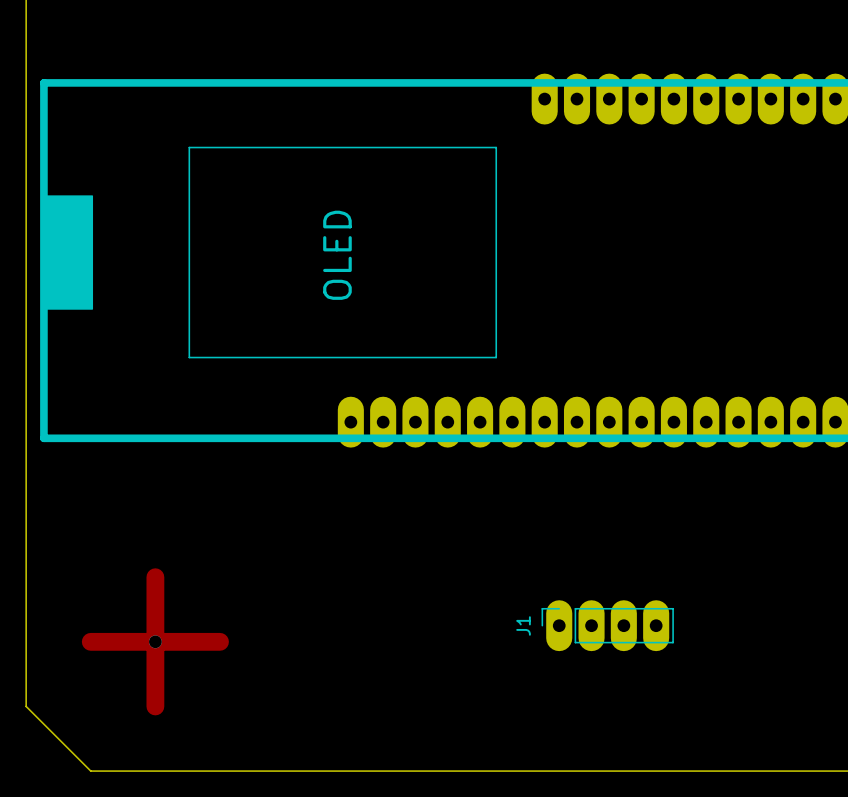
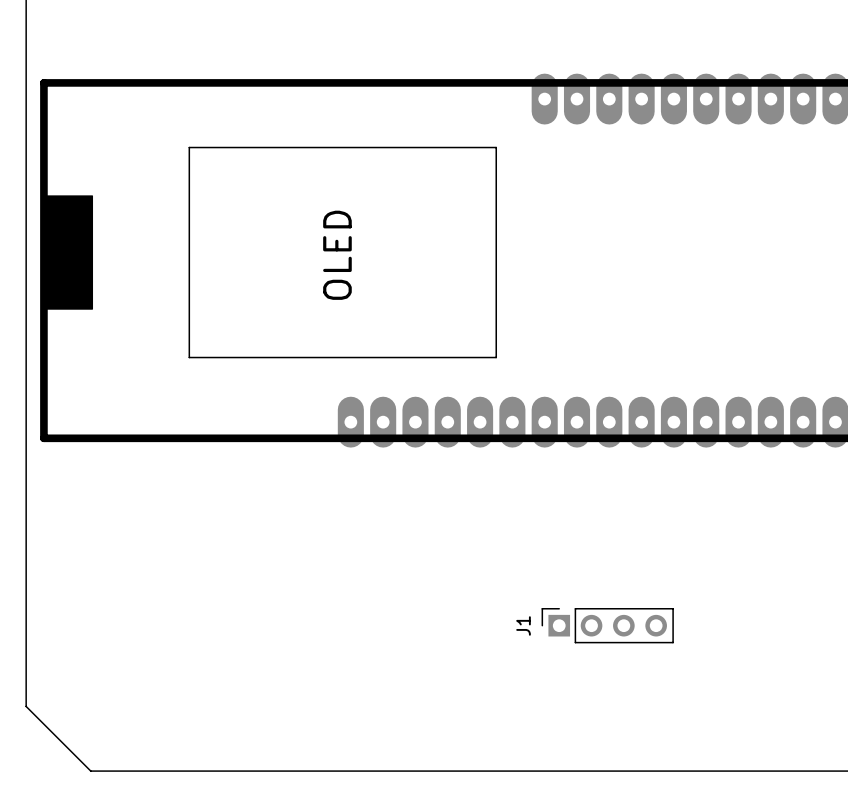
track: (155, 577) (155, 706) -> none
J1 footprint: [541, 600, 674, 652] -> [541, 608, 674, 644]
track: (90, 641) (220, 641) -> none
via: (155, 641) -> none

